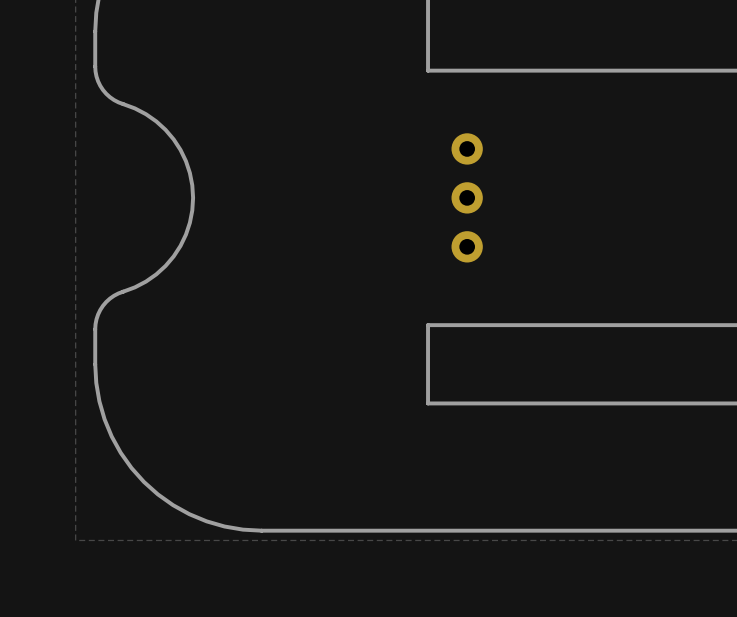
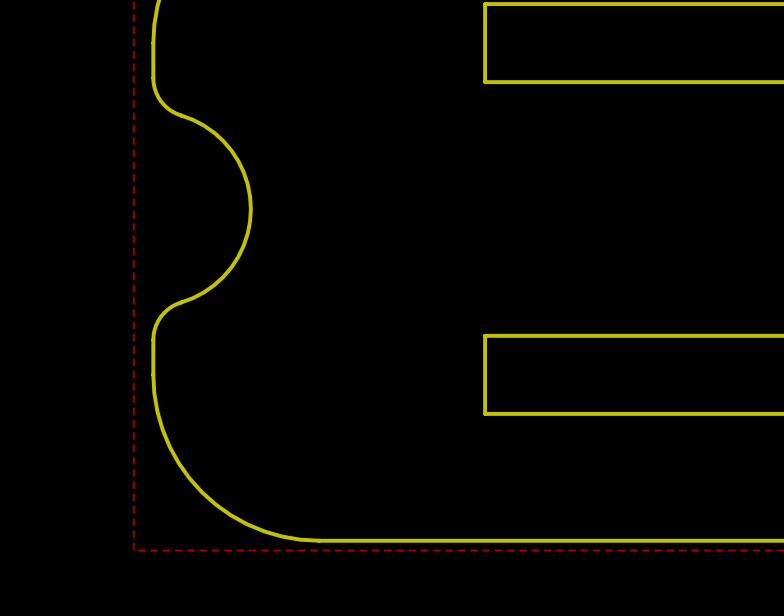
via: (467, 148) -> none
via: (467, 197) -> none
via: (467, 246) -> none

